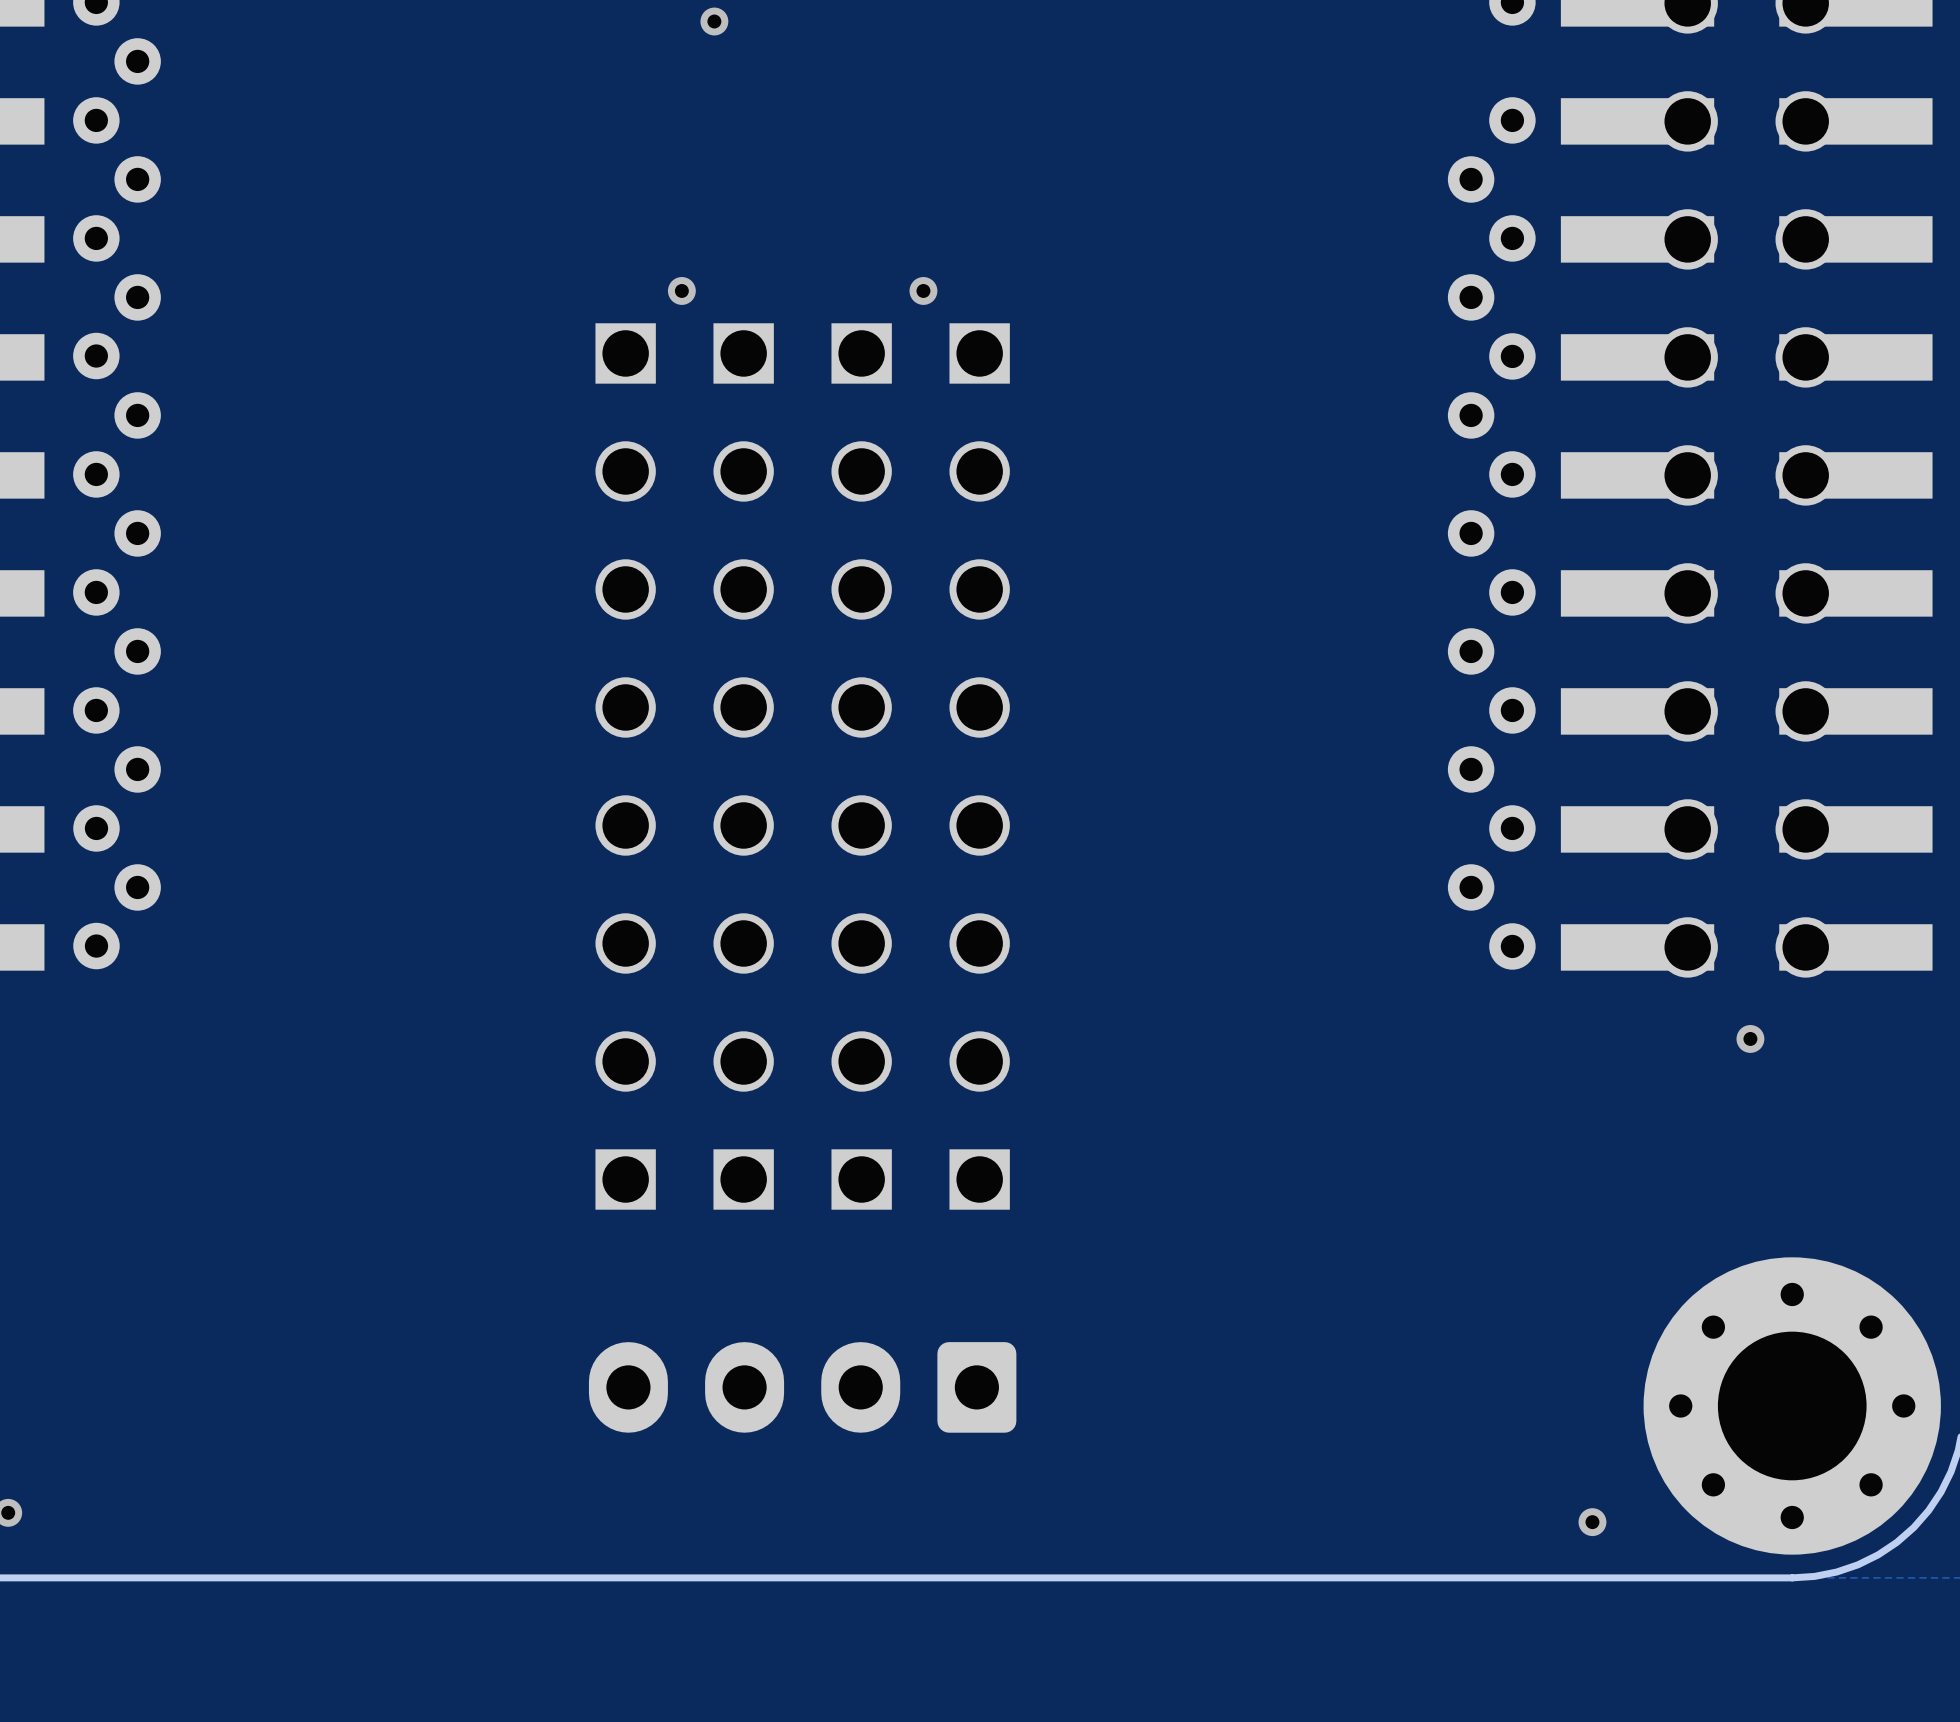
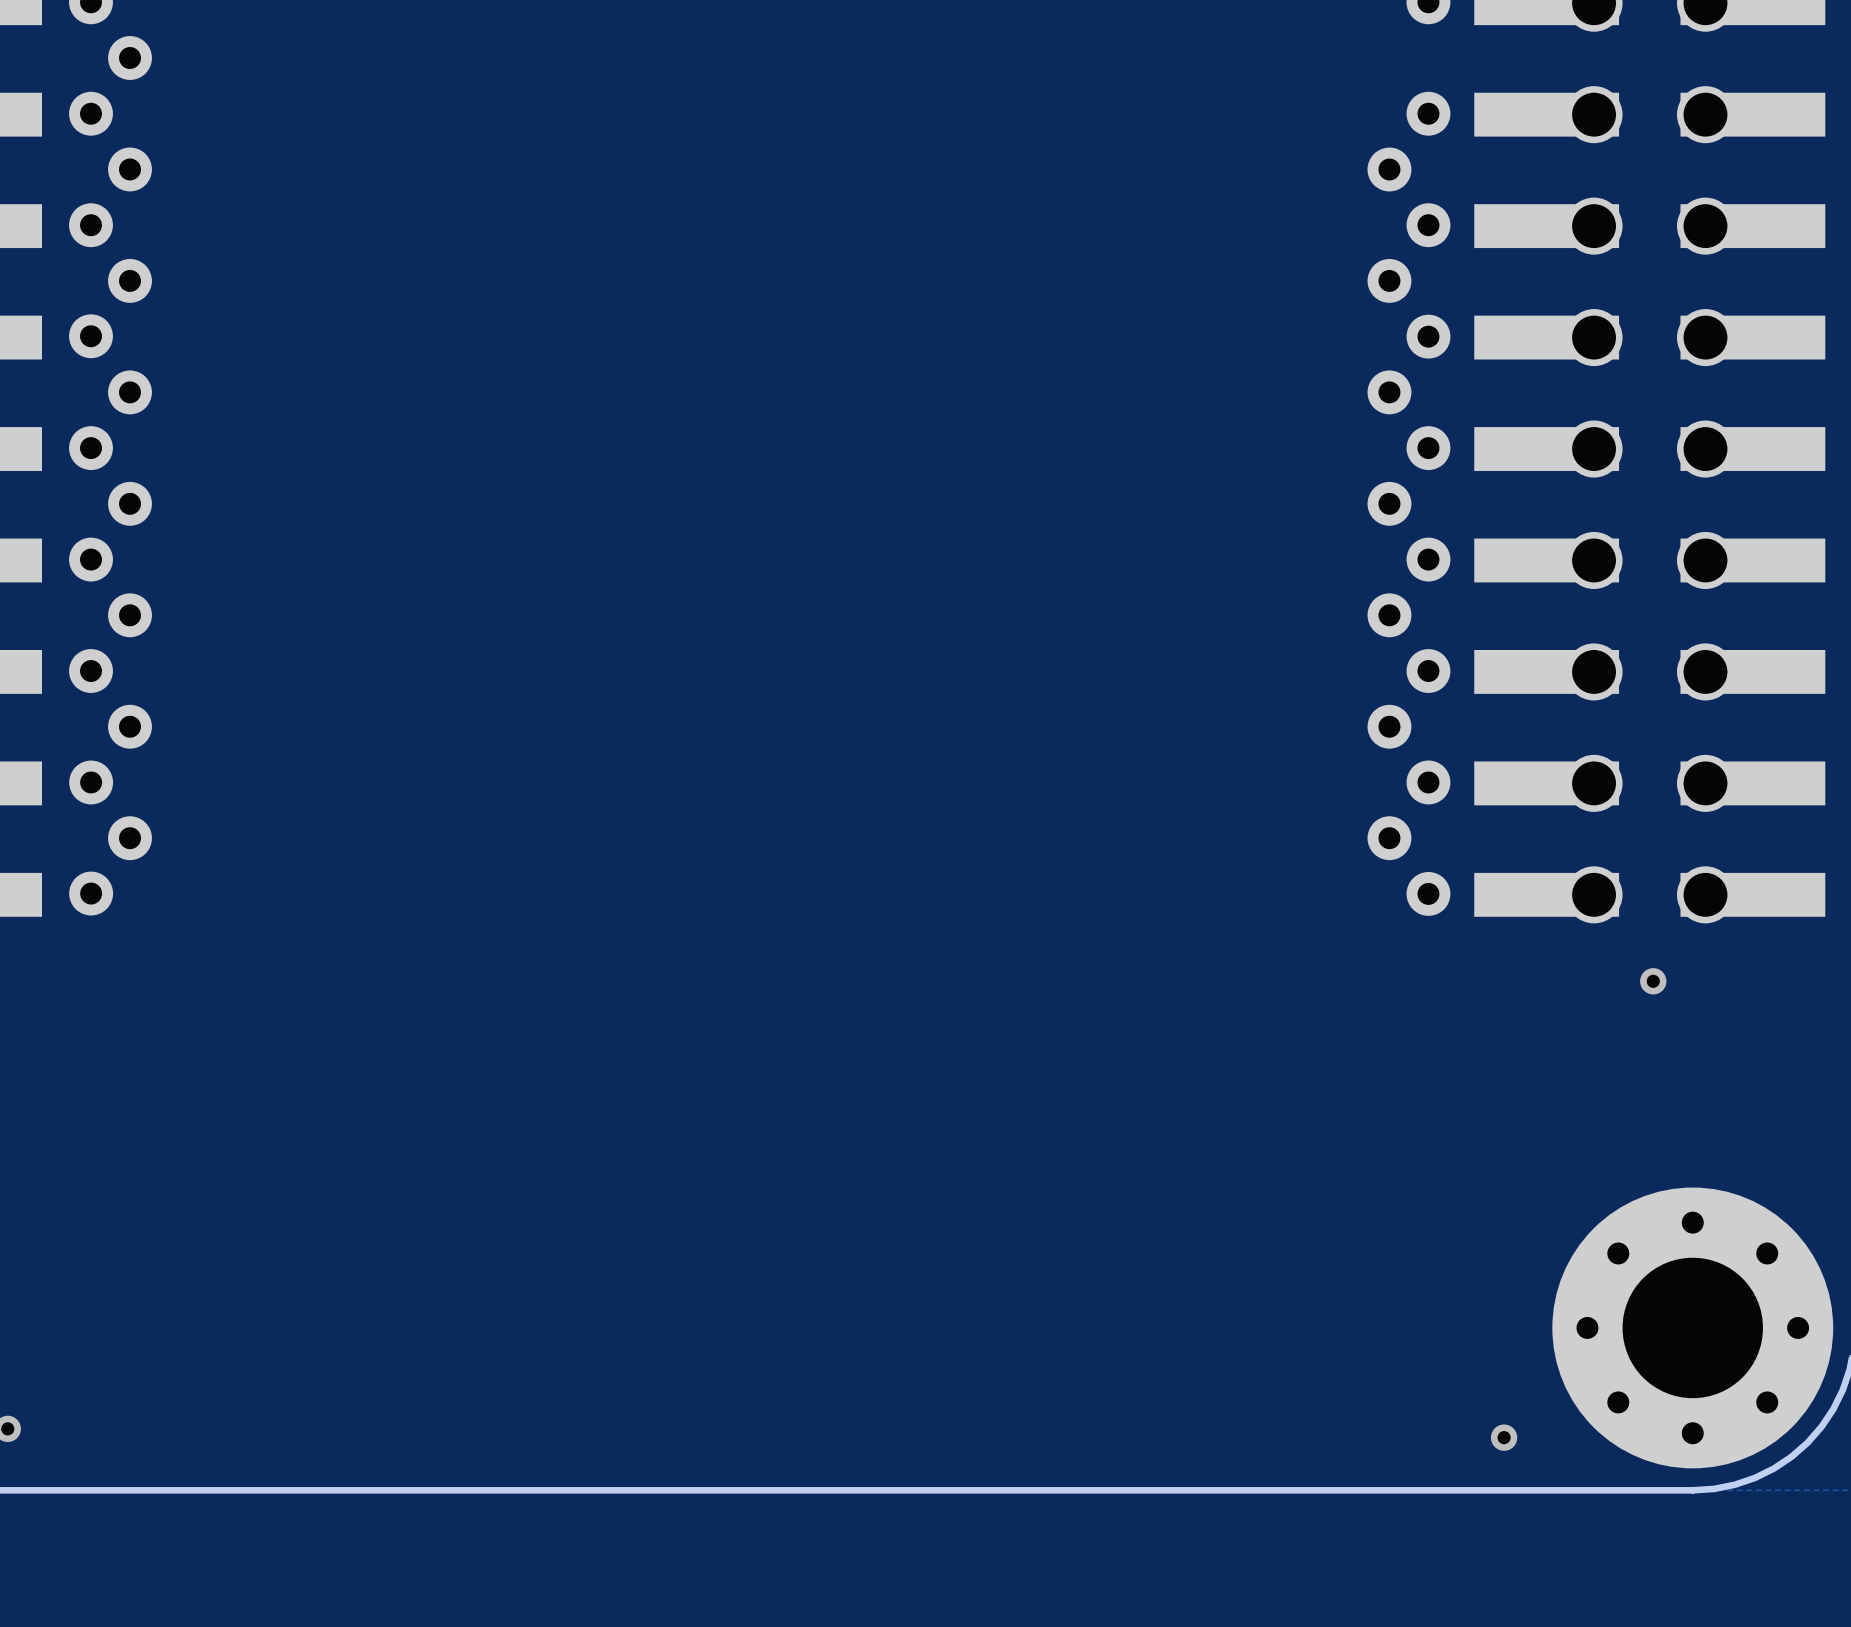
via: (714, 21) -> none
via: (681, 290) -> none
via: (923, 290) -> none
part: (625, 530) -> none
part: (743, 530) -> none
part: (861, 530) -> none
part: (979, 530) -> none
part: (625, 1002) -> none
part: (743, 1002) -> none
part: (861, 1002) -> none
part: (979, 1002) -> none
part: (802, 1387) -> none

